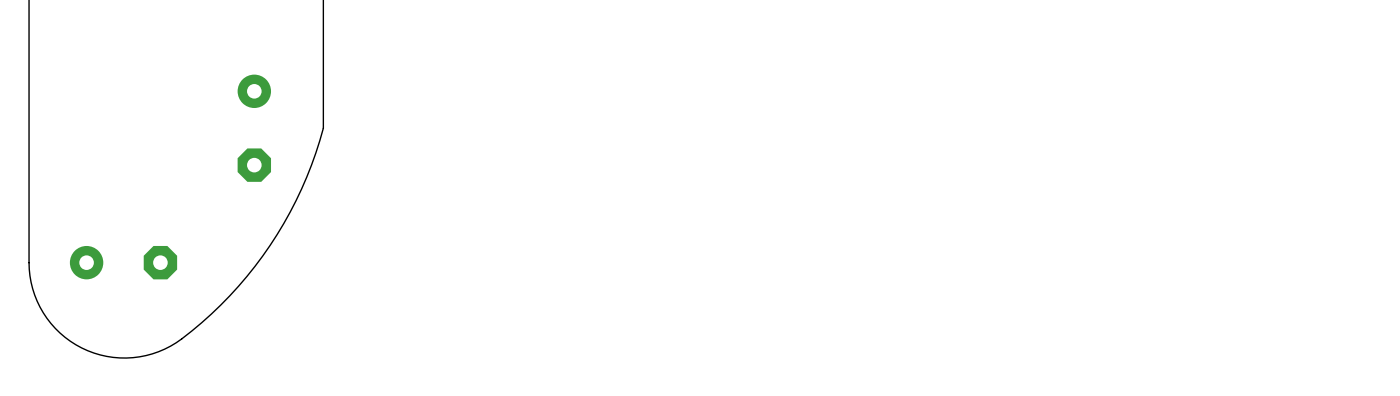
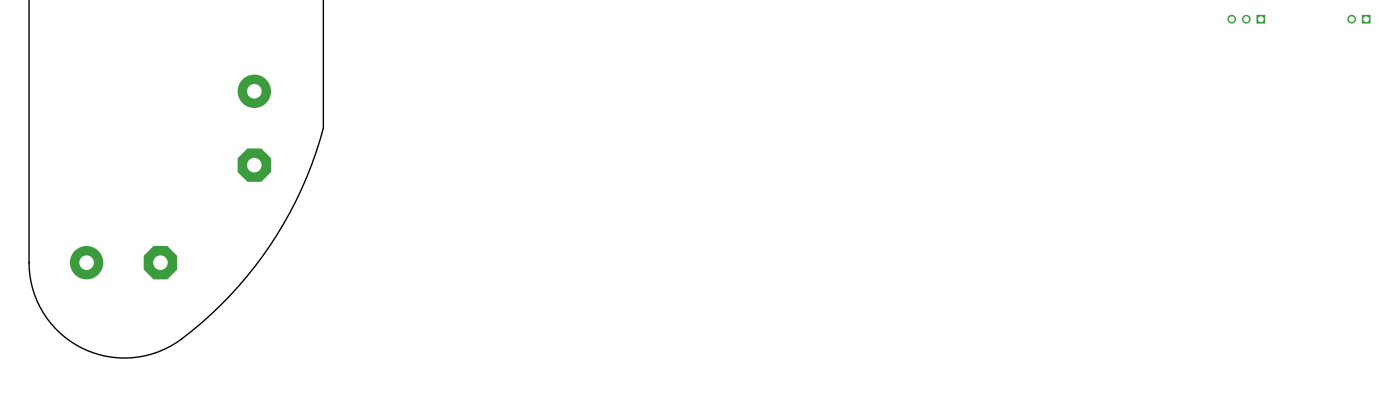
part: none -> (1246, 19)
part: none -> (1358, 19)

